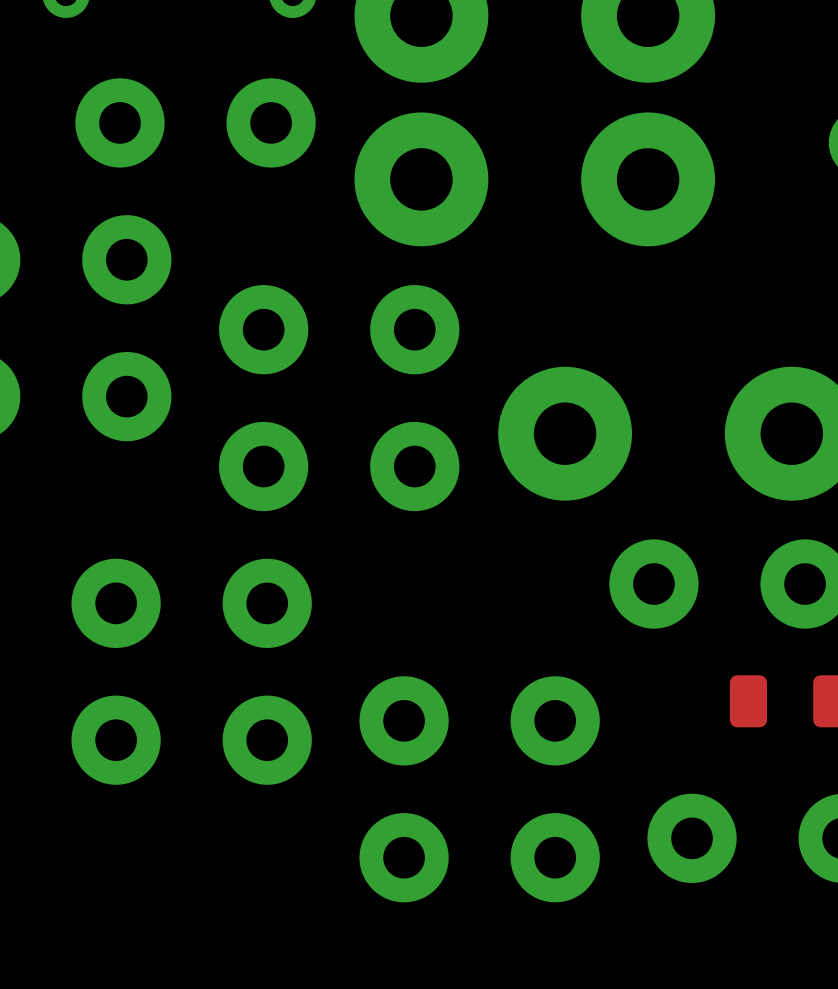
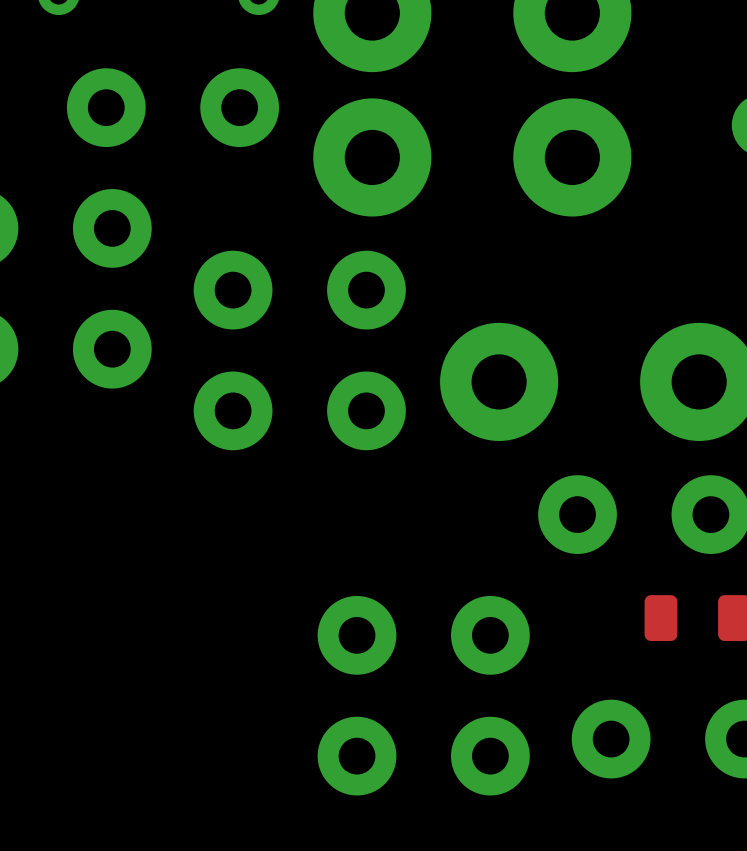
part: (191, 603) -> none
part: (191, 740) -> none

